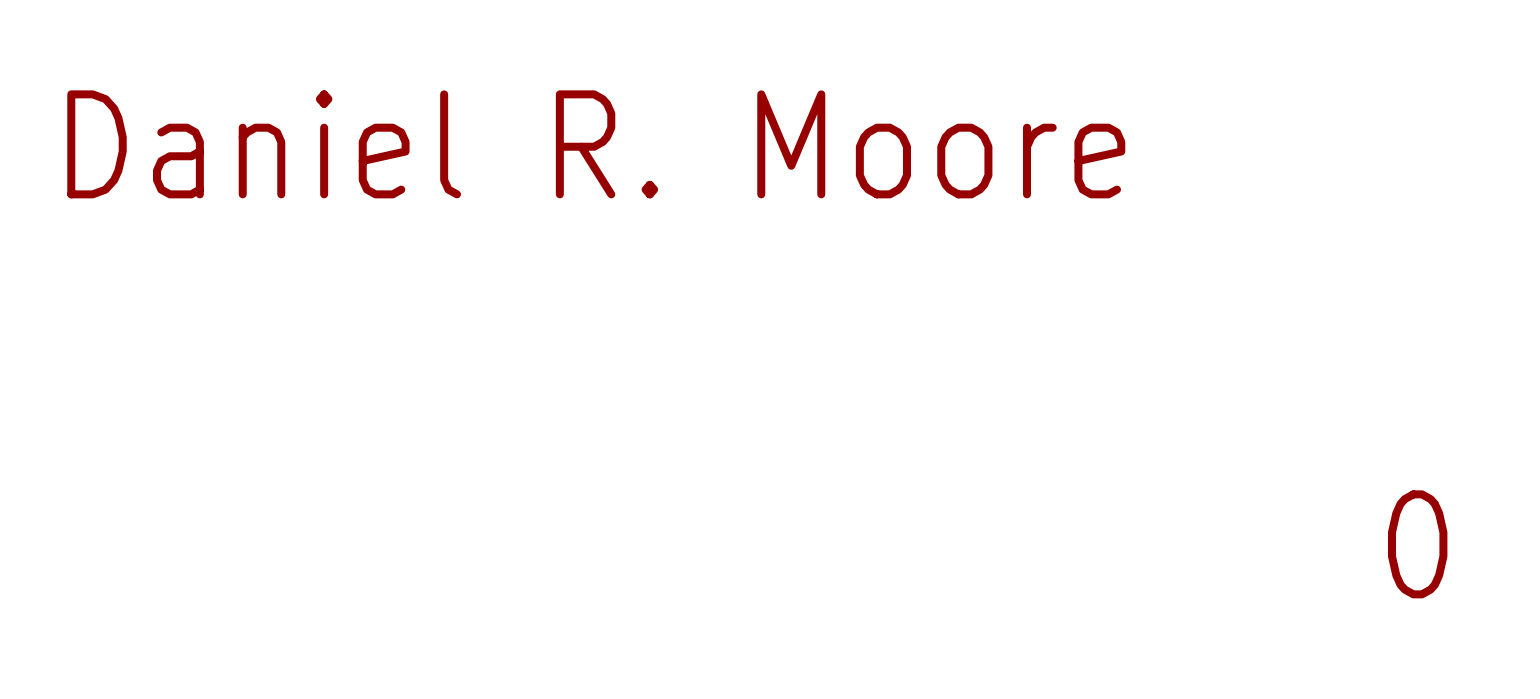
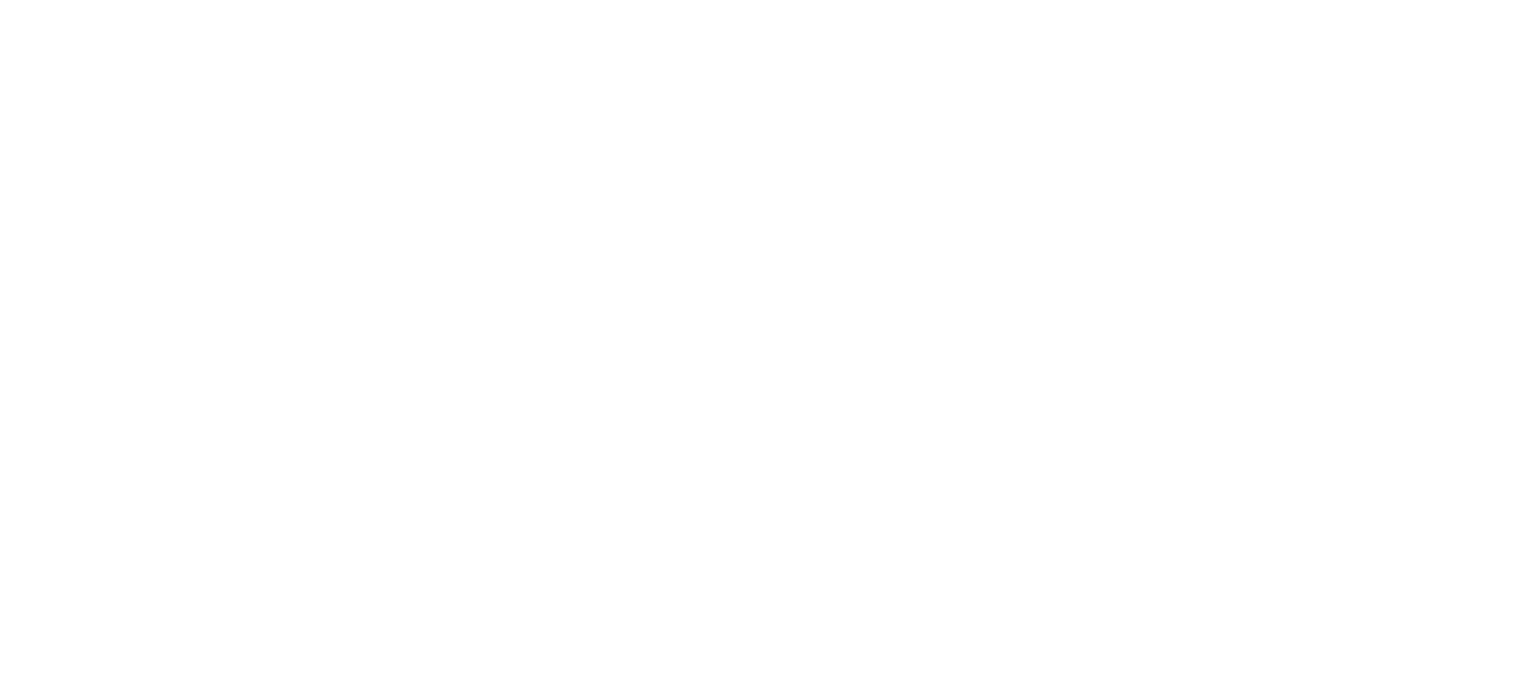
text: Daniel R. Moore (596, 144) -> none
text: 0 (1417, 544) -> none

